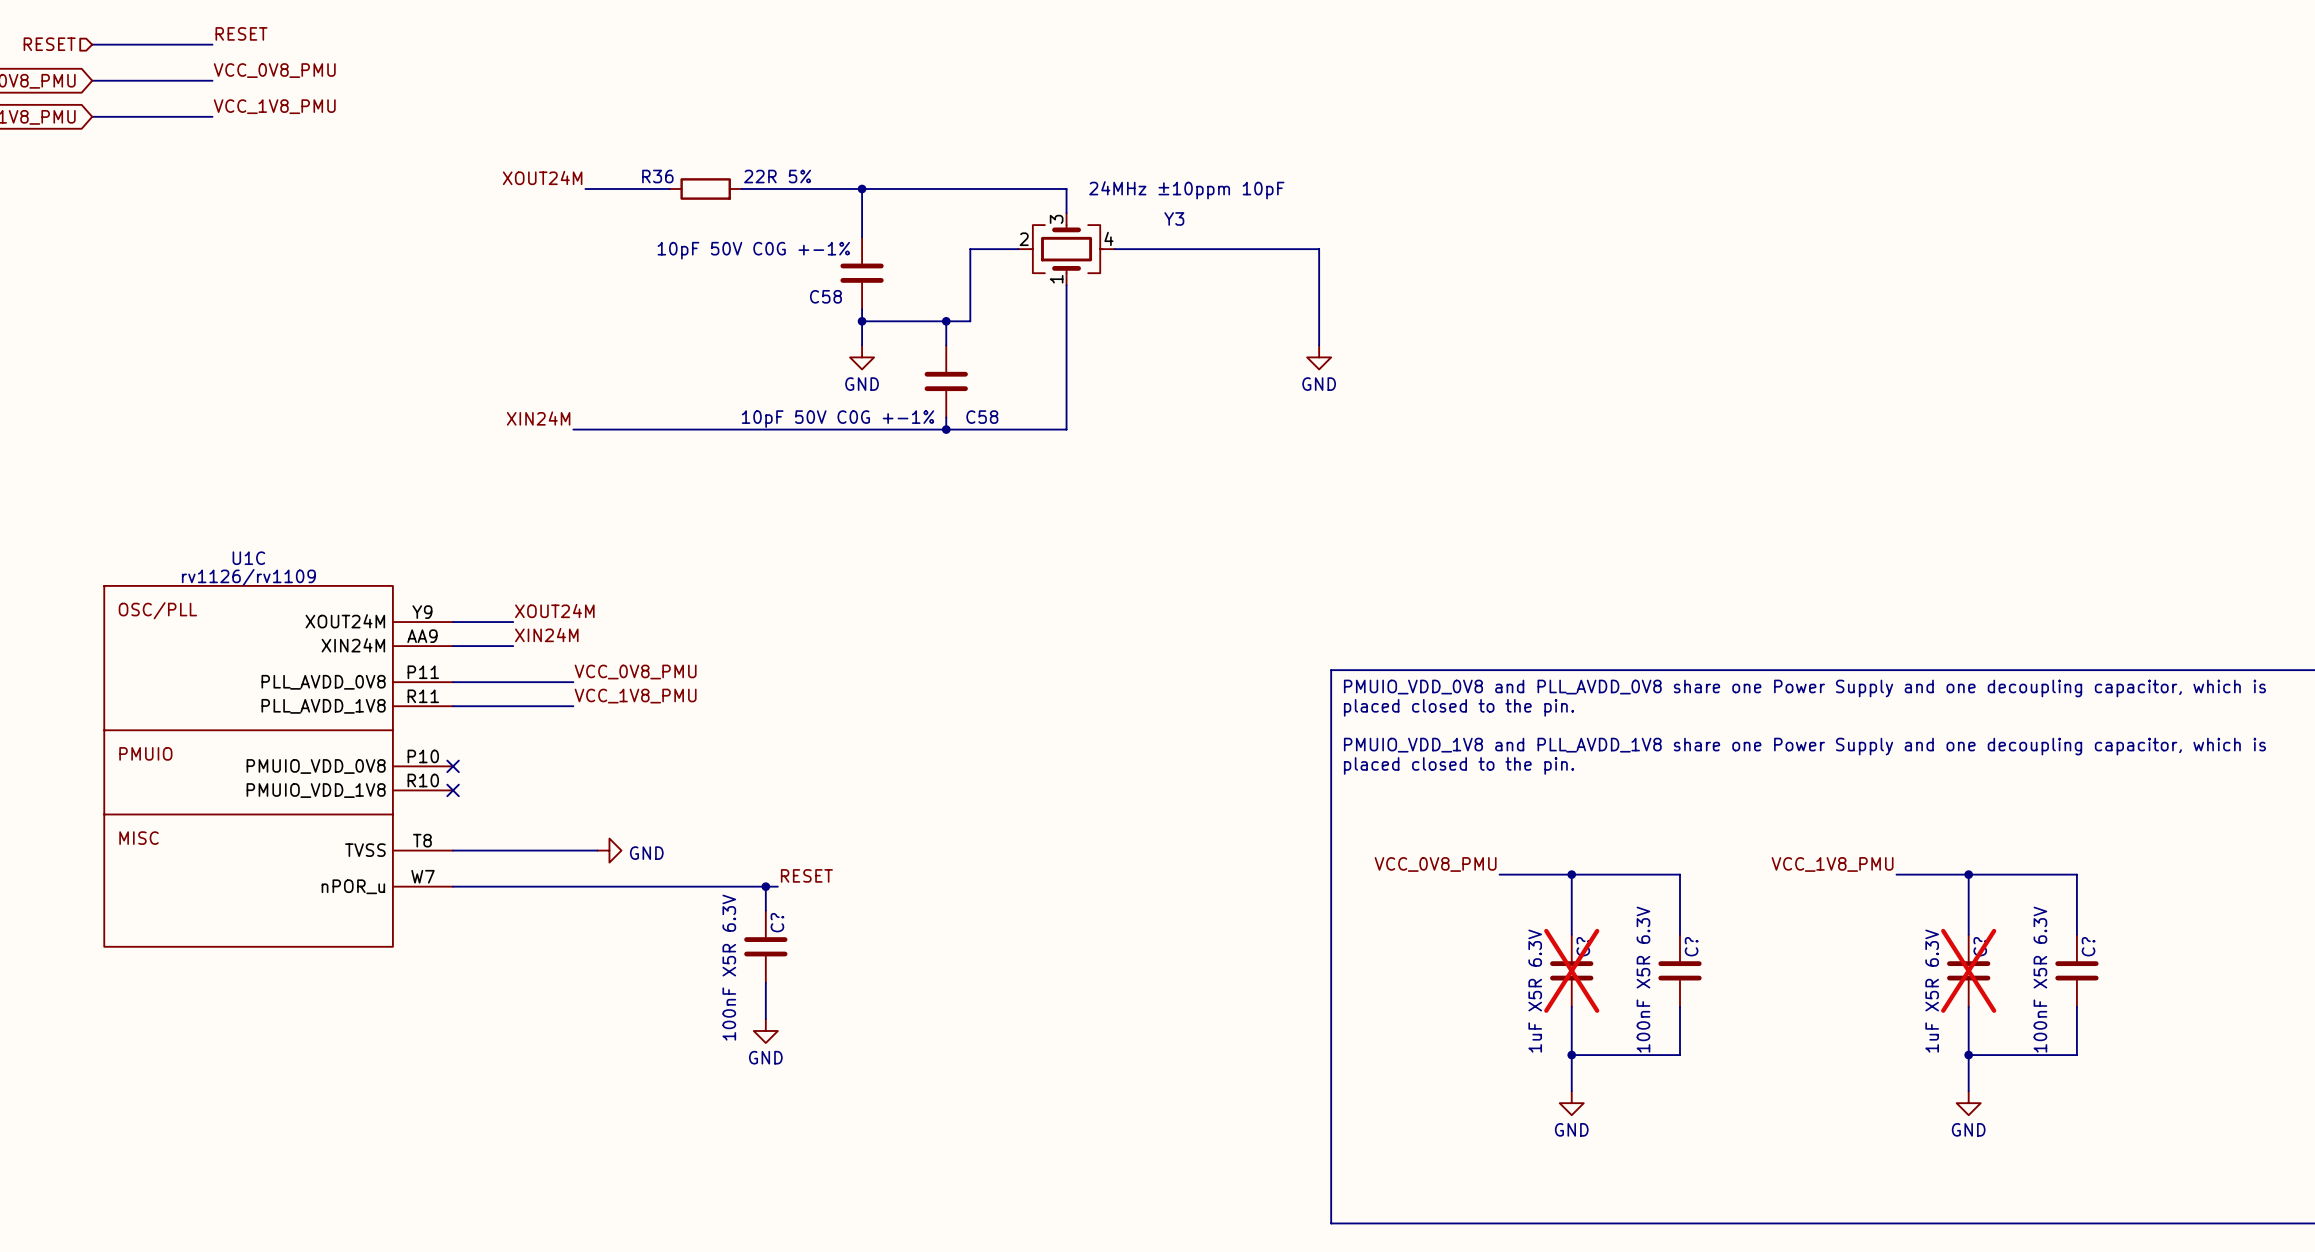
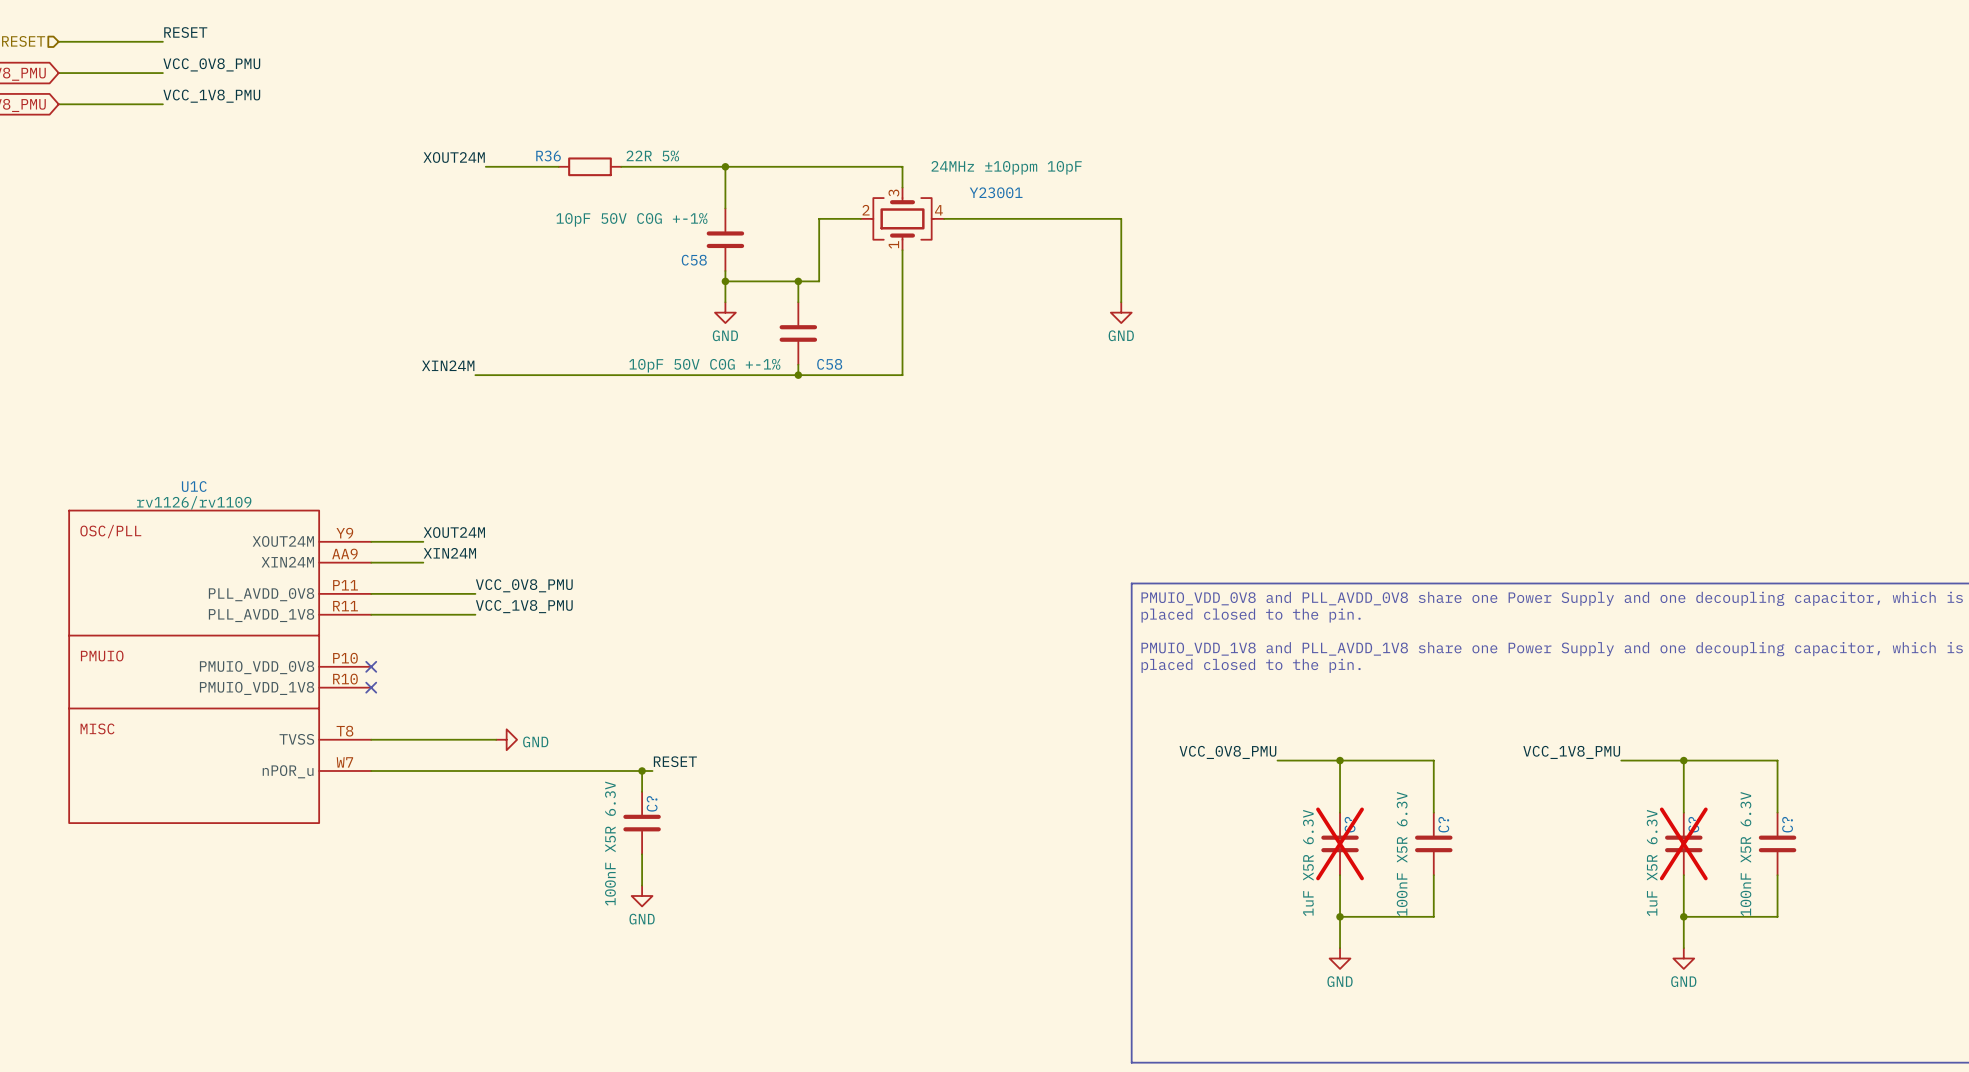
Y3 name: Y3 (1174, 218) -> Y23001 (996, 192)

